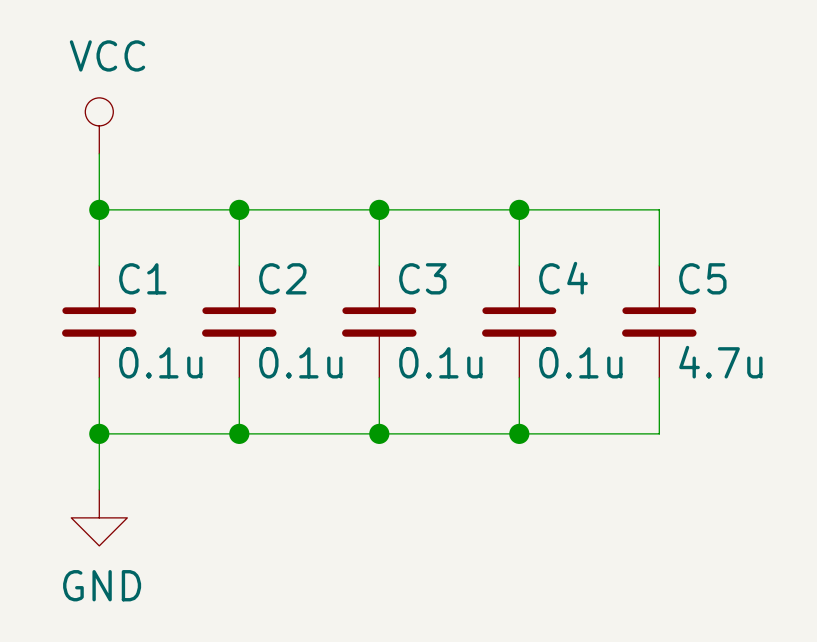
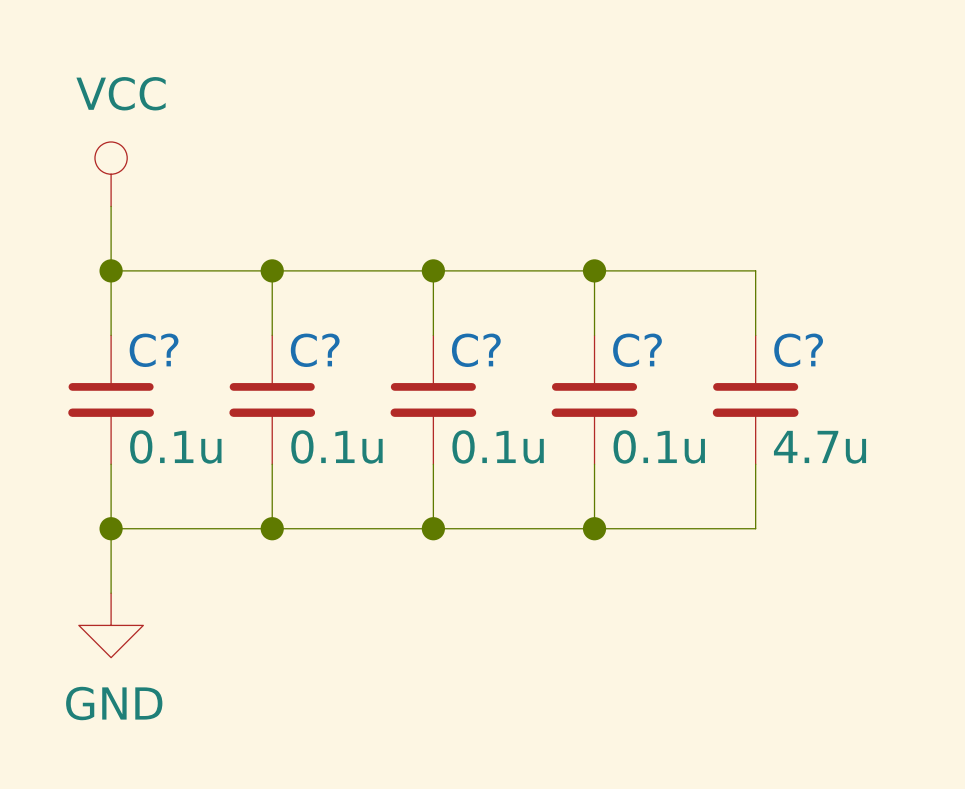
C1 name: C1 (142, 278) -> C? (154, 350)
C2 name: C2 (282, 278) -> C? (315, 350)
C3 name: C3 (422, 278) -> C? (476, 350)
C4 name: C4 (563, 278) -> C? (637, 350)
C5 name: C5 (702, 278) -> C? (798, 350)

